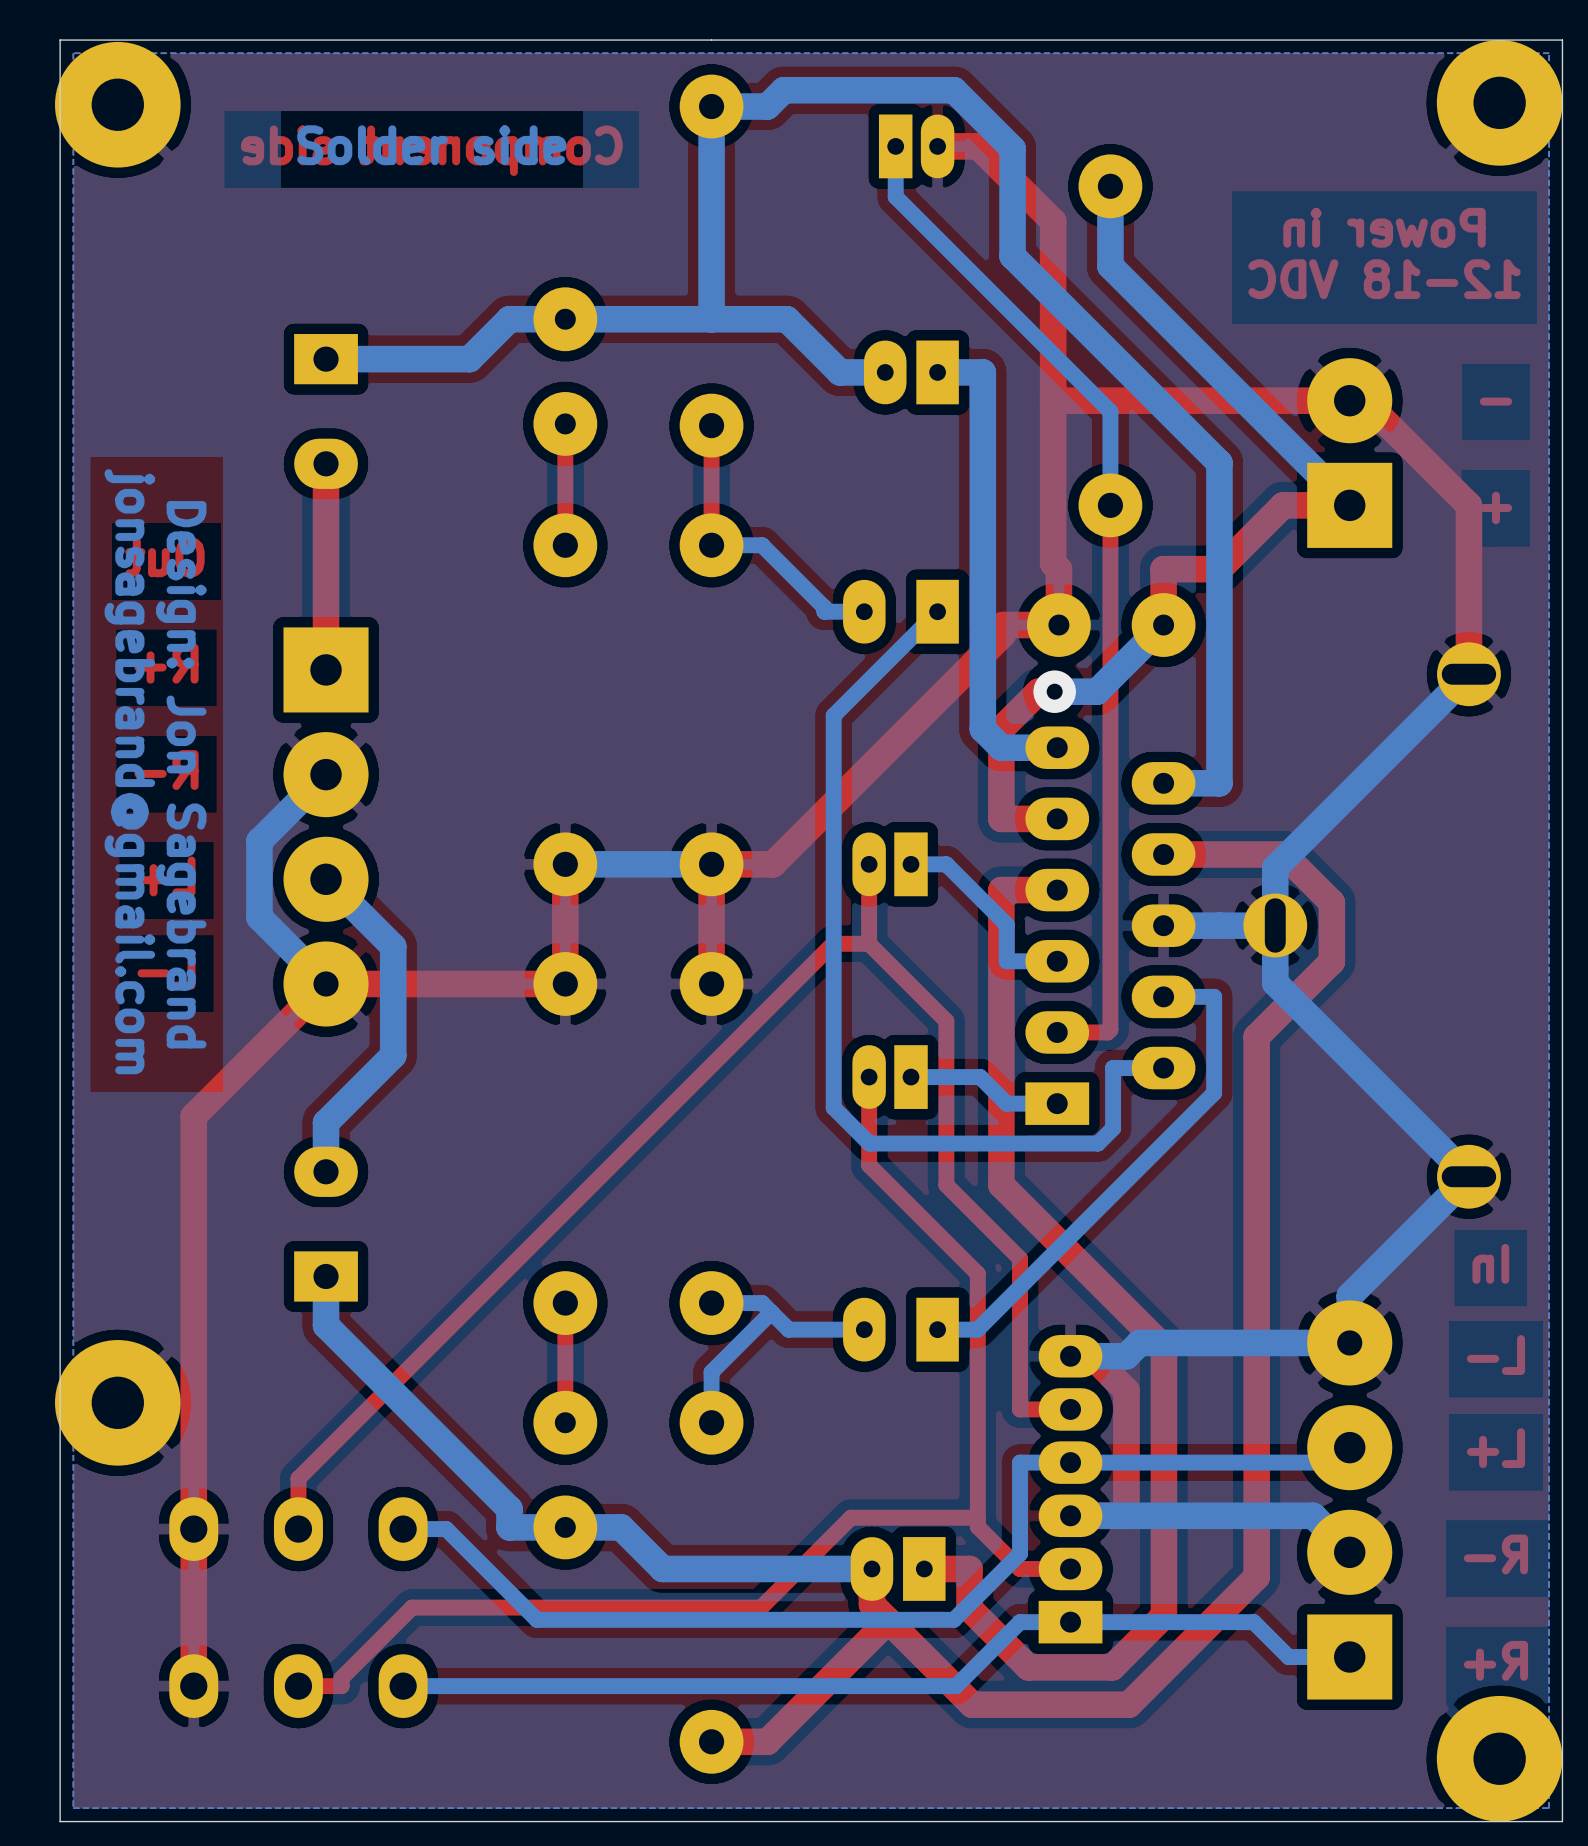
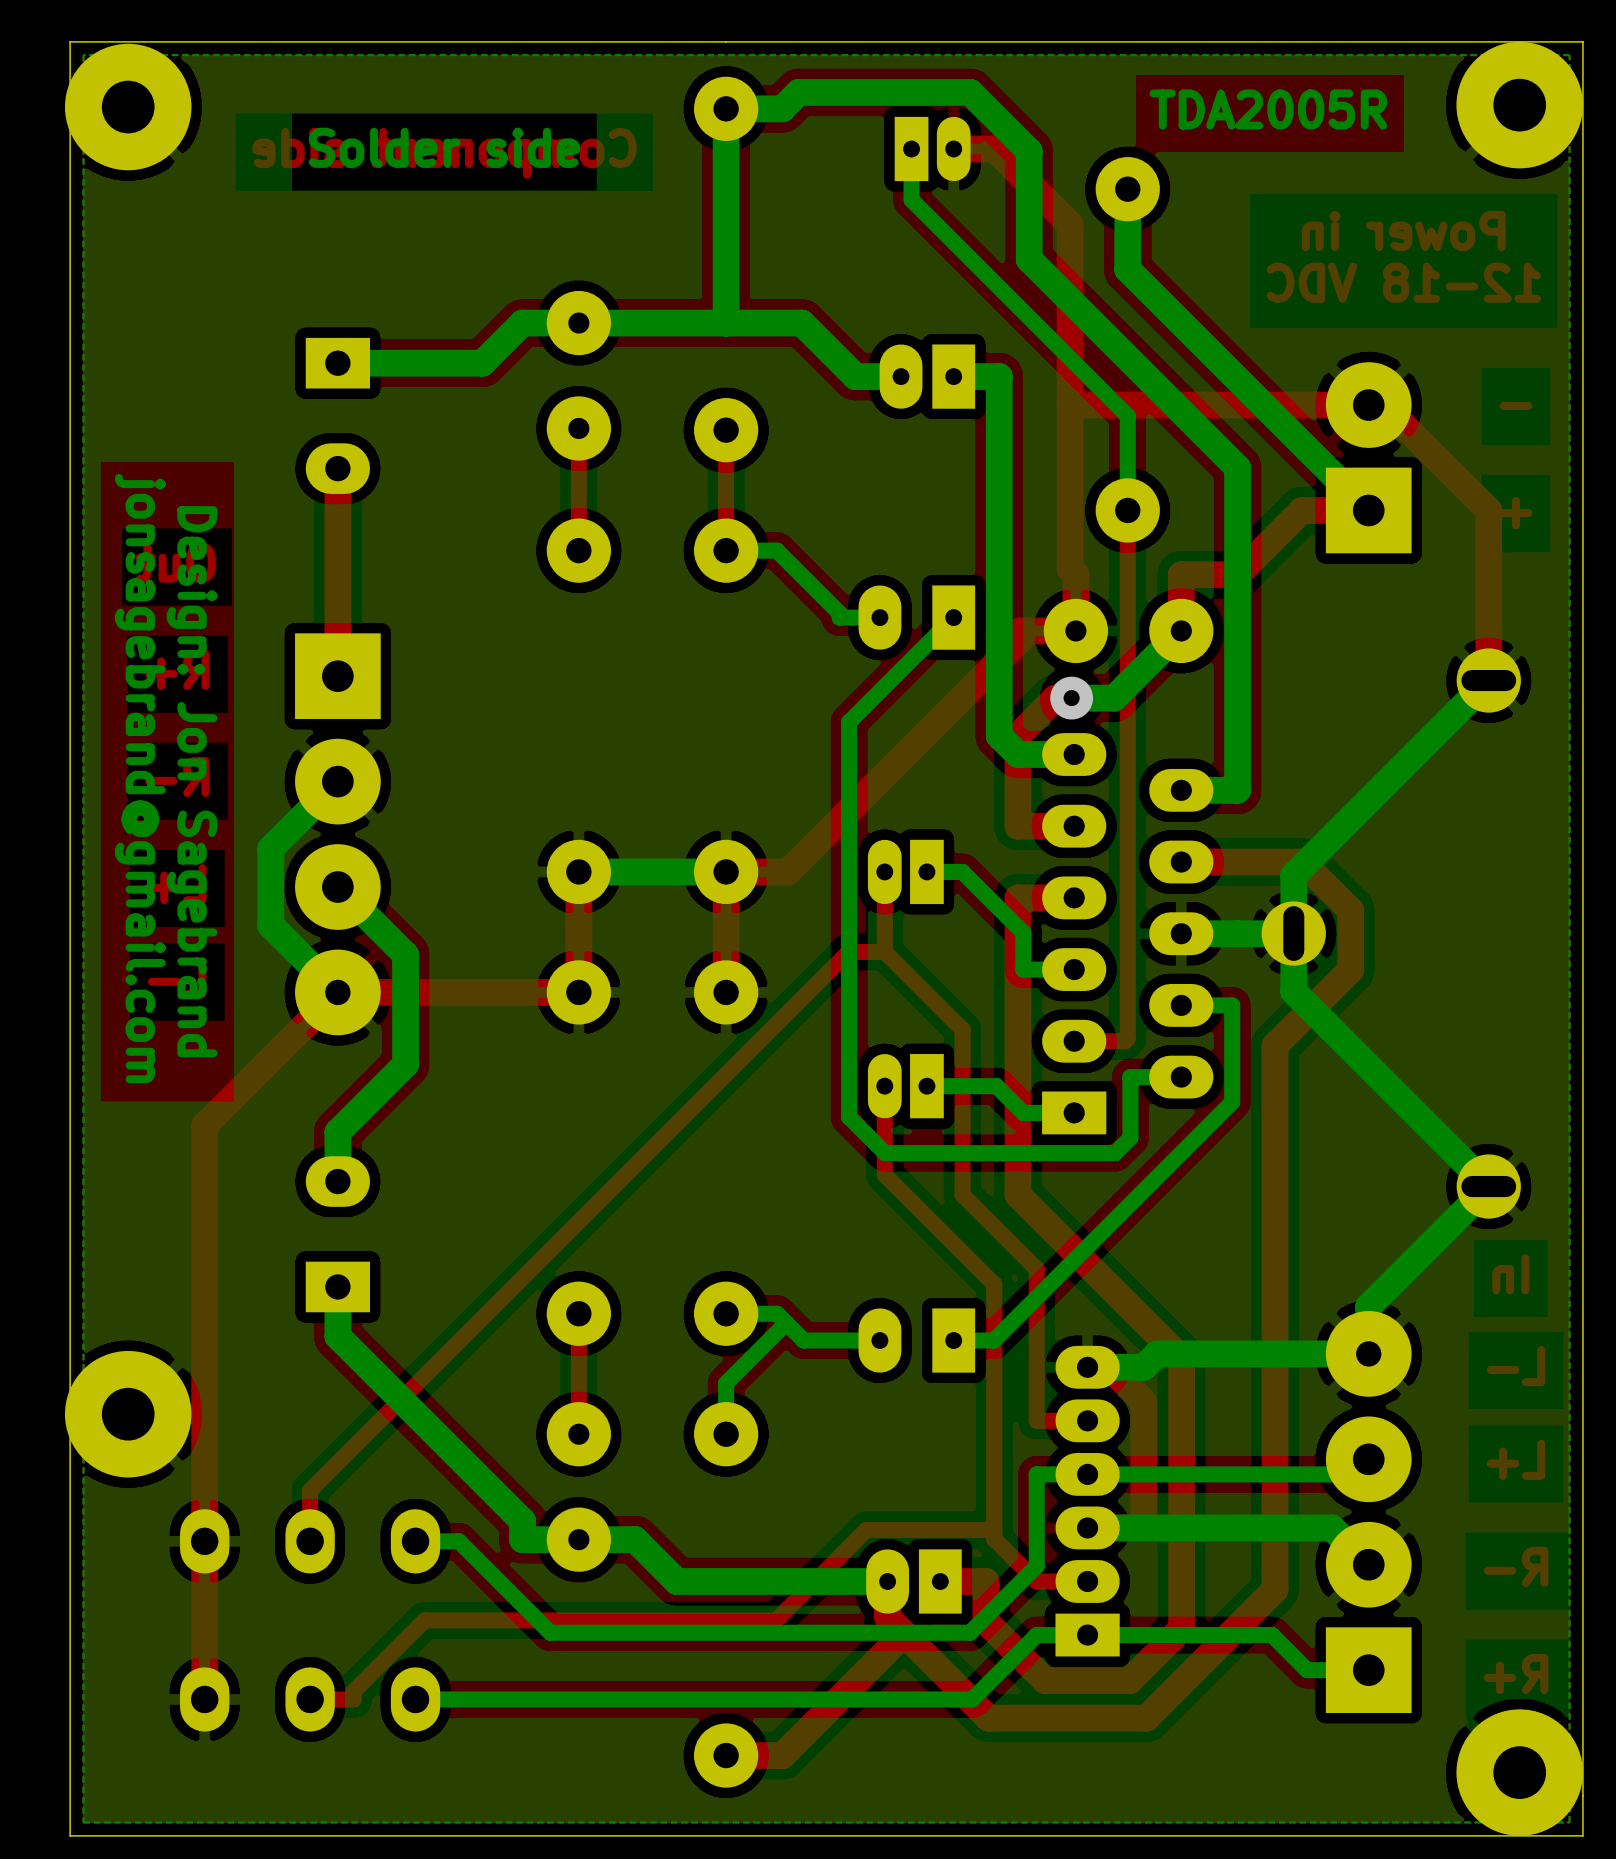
text: none -> TDA2005R (1268, 109)

